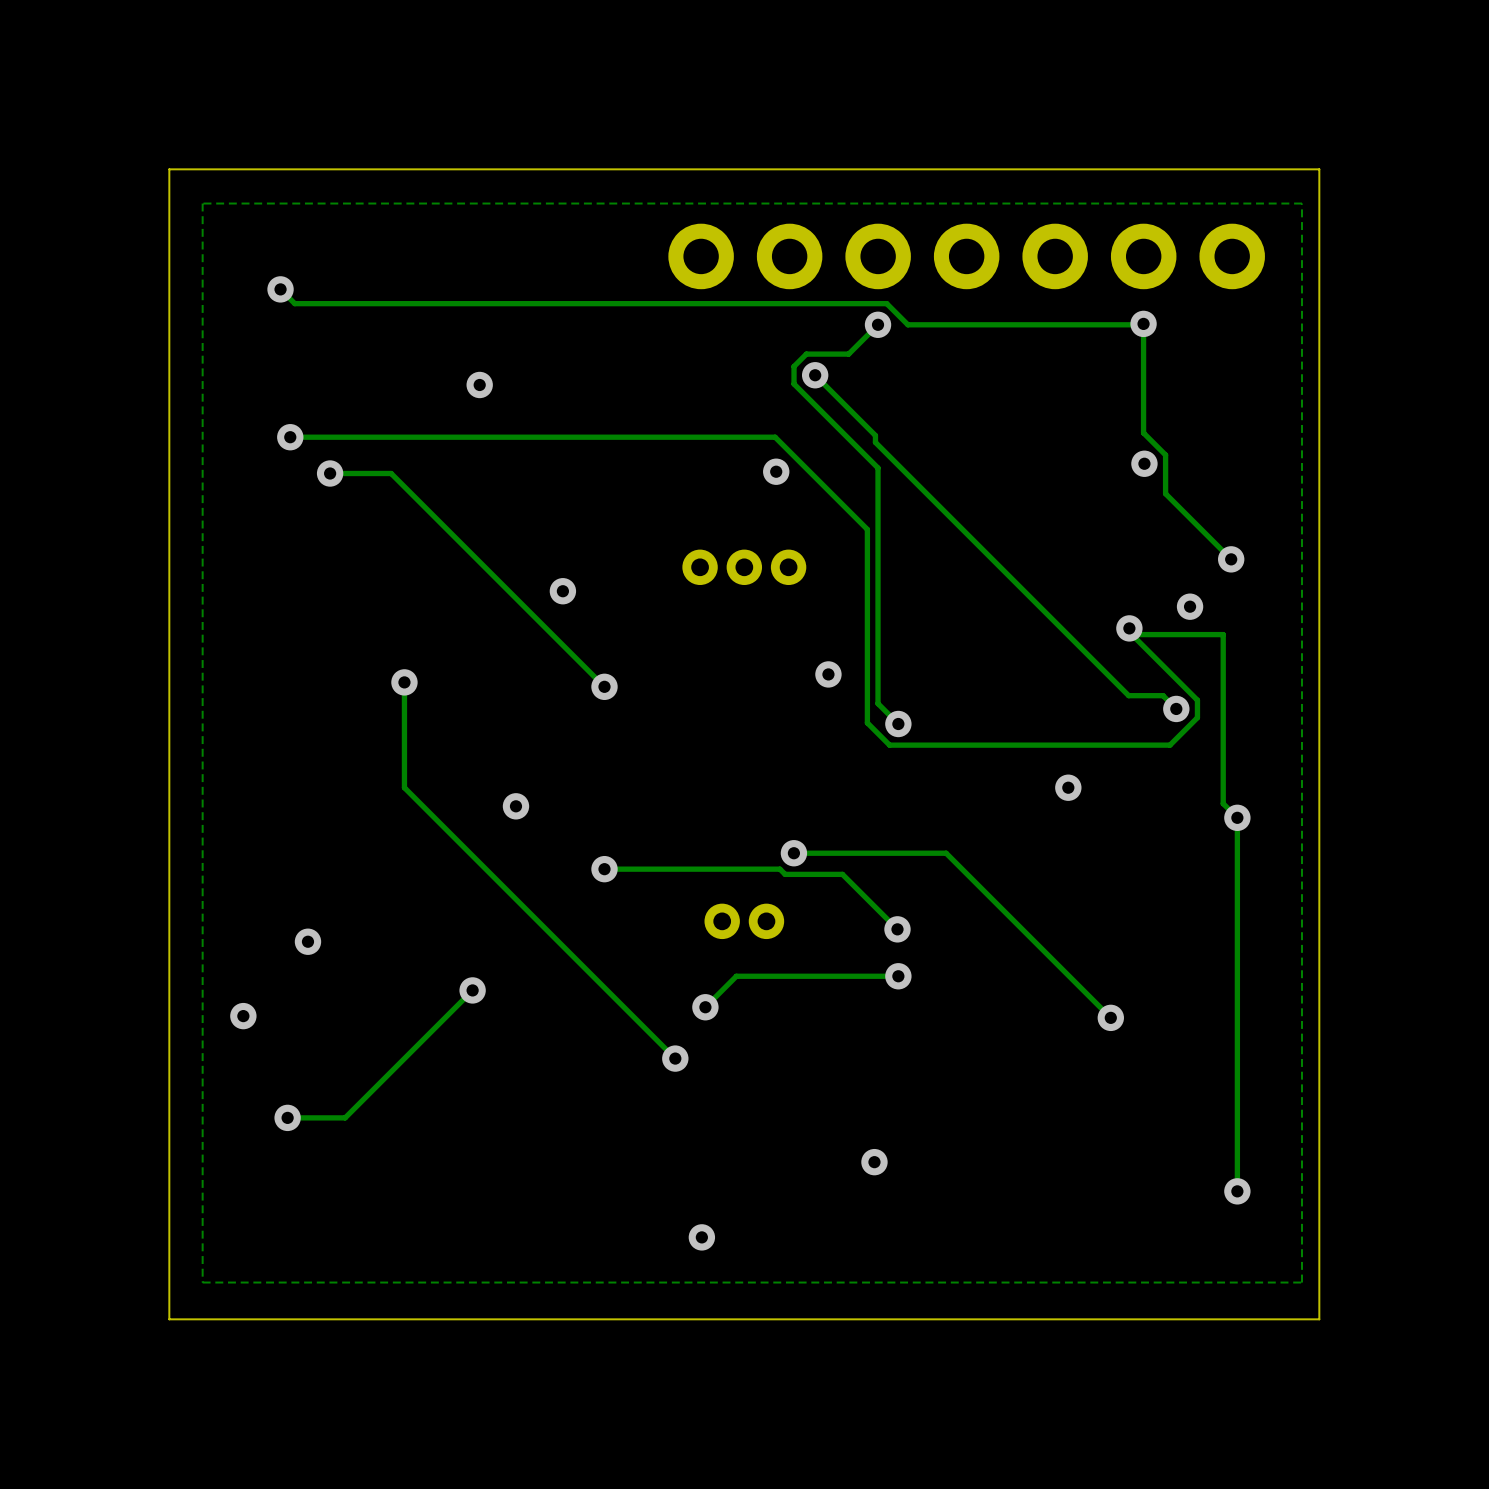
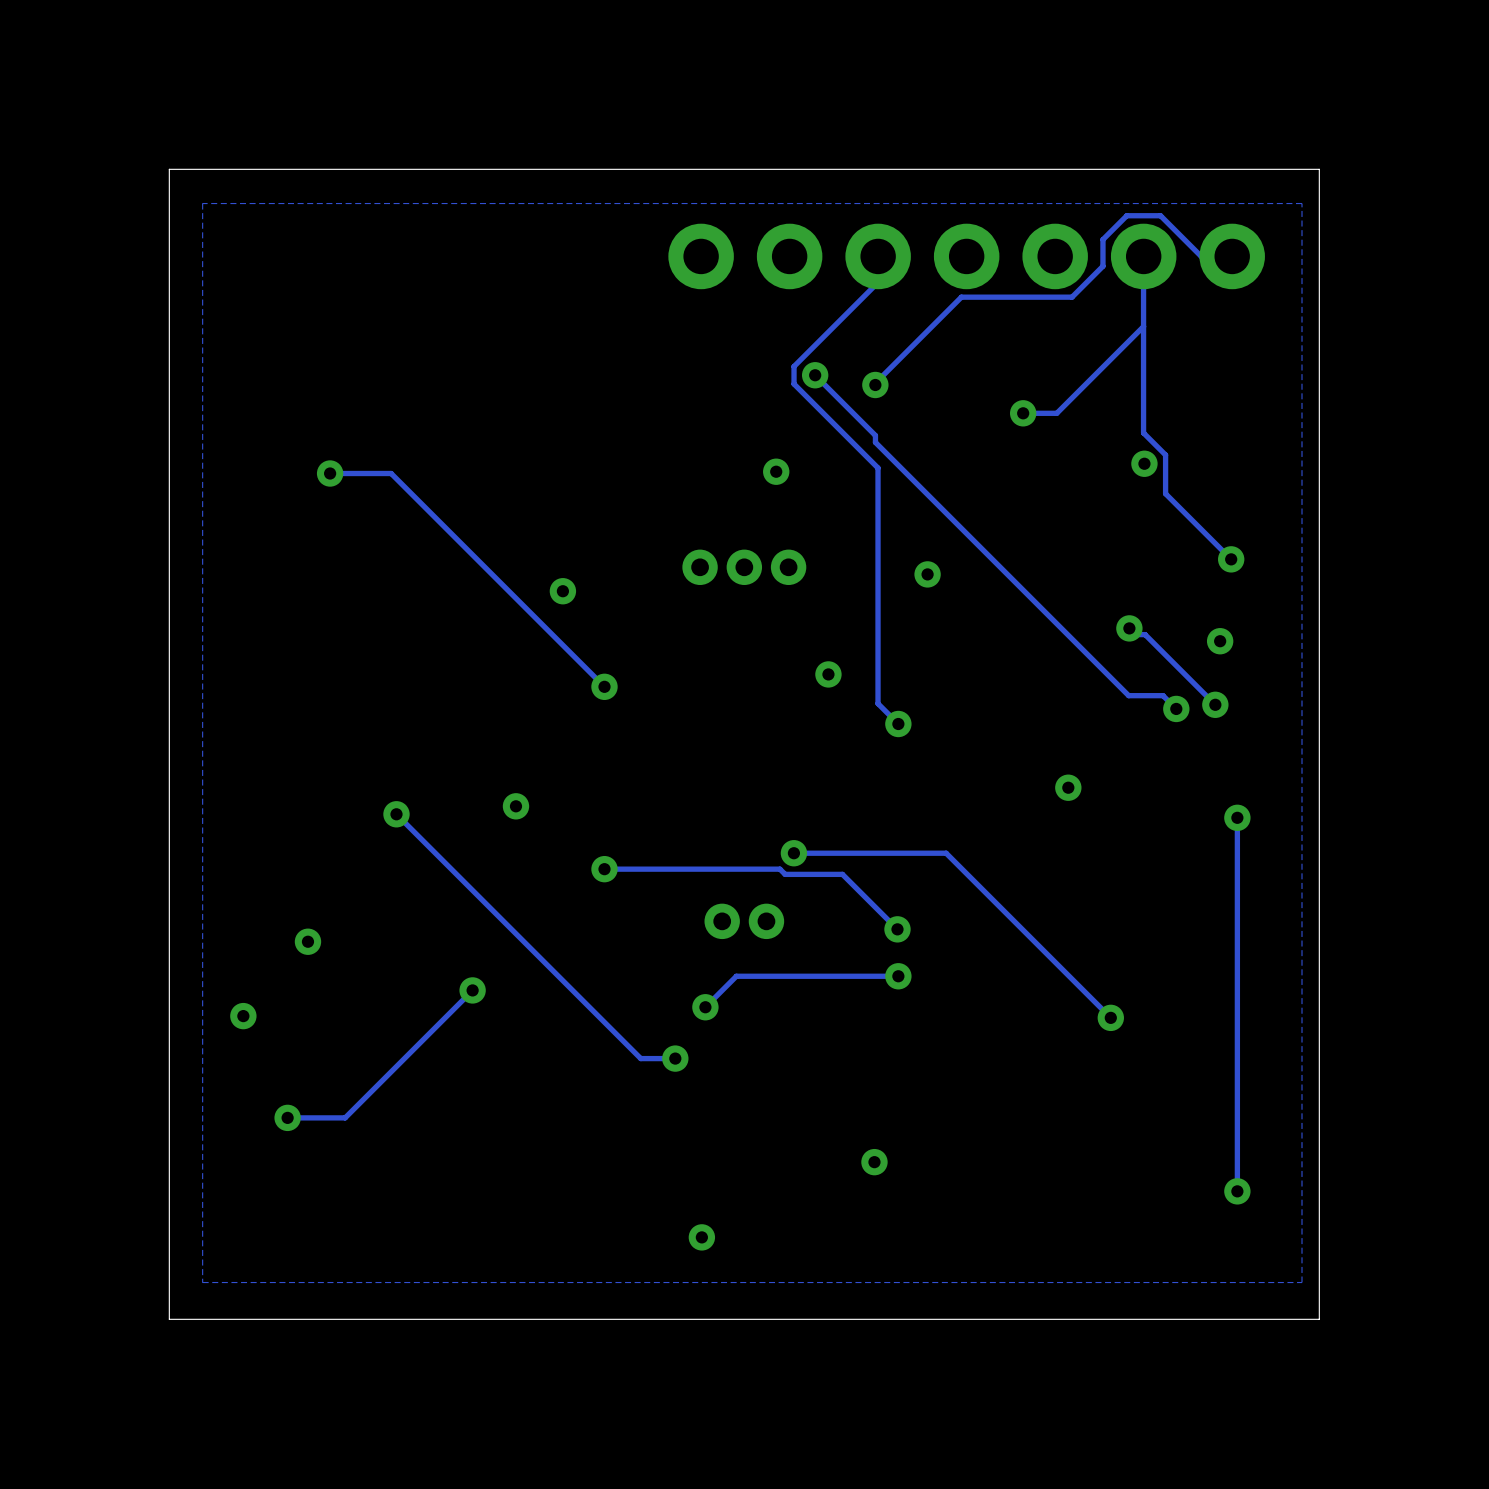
track: none -> (1232, 256) (1201, 256) (1160, 215) (1126, 215) (1102, 239) (1102, 266) (1072, 297) (961, 297) (875, 384)
track: (280, 289) (294, 303) (886, 303) (907, 324) (1143, 324) -> (1143, 256) (1143, 323)
via: (280, 289) -> none
via: (1143, 323) -> none
track: (878, 324) (848, 354) (806, 354) -> (878, 256) (878, 282) (806, 354)
via position: (878, 324) -> (875, 384)
track: none -> (1143, 326) (1056, 413) (1023, 413)
via: (479, 384) -> none
via: none -> (1023, 413)
track: (290, 437) (775, 437) (867, 529) (867, 722) (889, 745) (1170, 745) (1197, 717) (1197, 700) (1129, 632) (1129, 628) -> none
via: (290, 437) -> none
via: none -> (927, 574)
via position: (1190, 606) -> (1220, 641)
track: (1145, 634) (1223, 634) (1223, 803) (1237, 817) -> (1145, 634) (1215, 704)
track: (404, 682) (404, 787) (675, 1058) -> (396, 814) (640, 1058) (675, 1058)
via position: (404, 682) -> (396, 814)
via: none -> (1215, 704)

